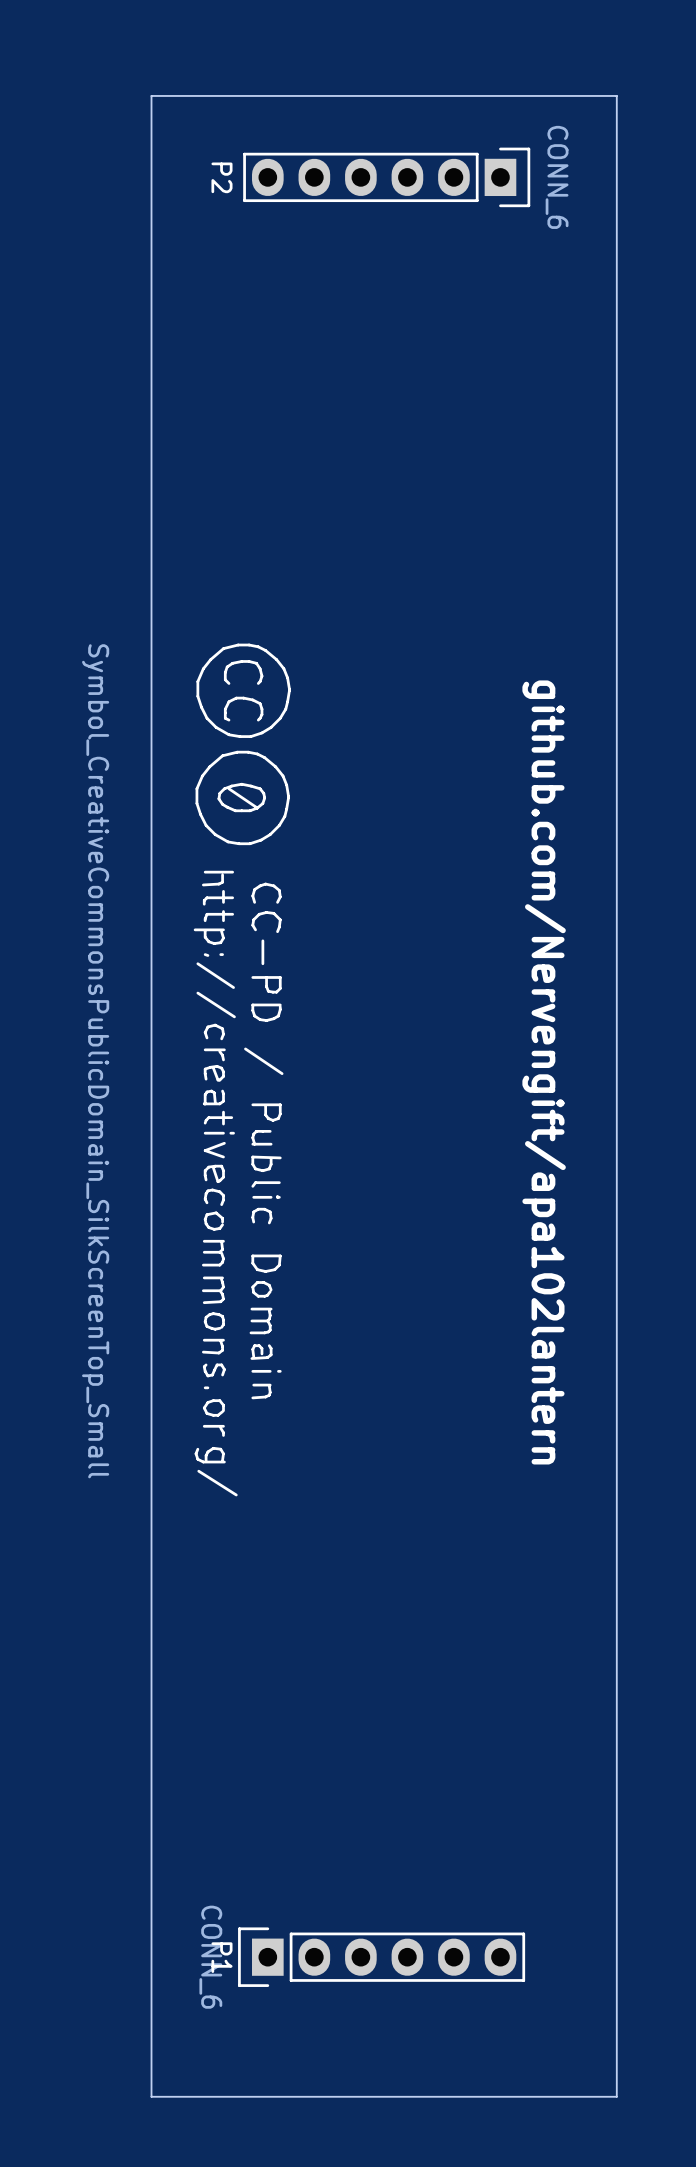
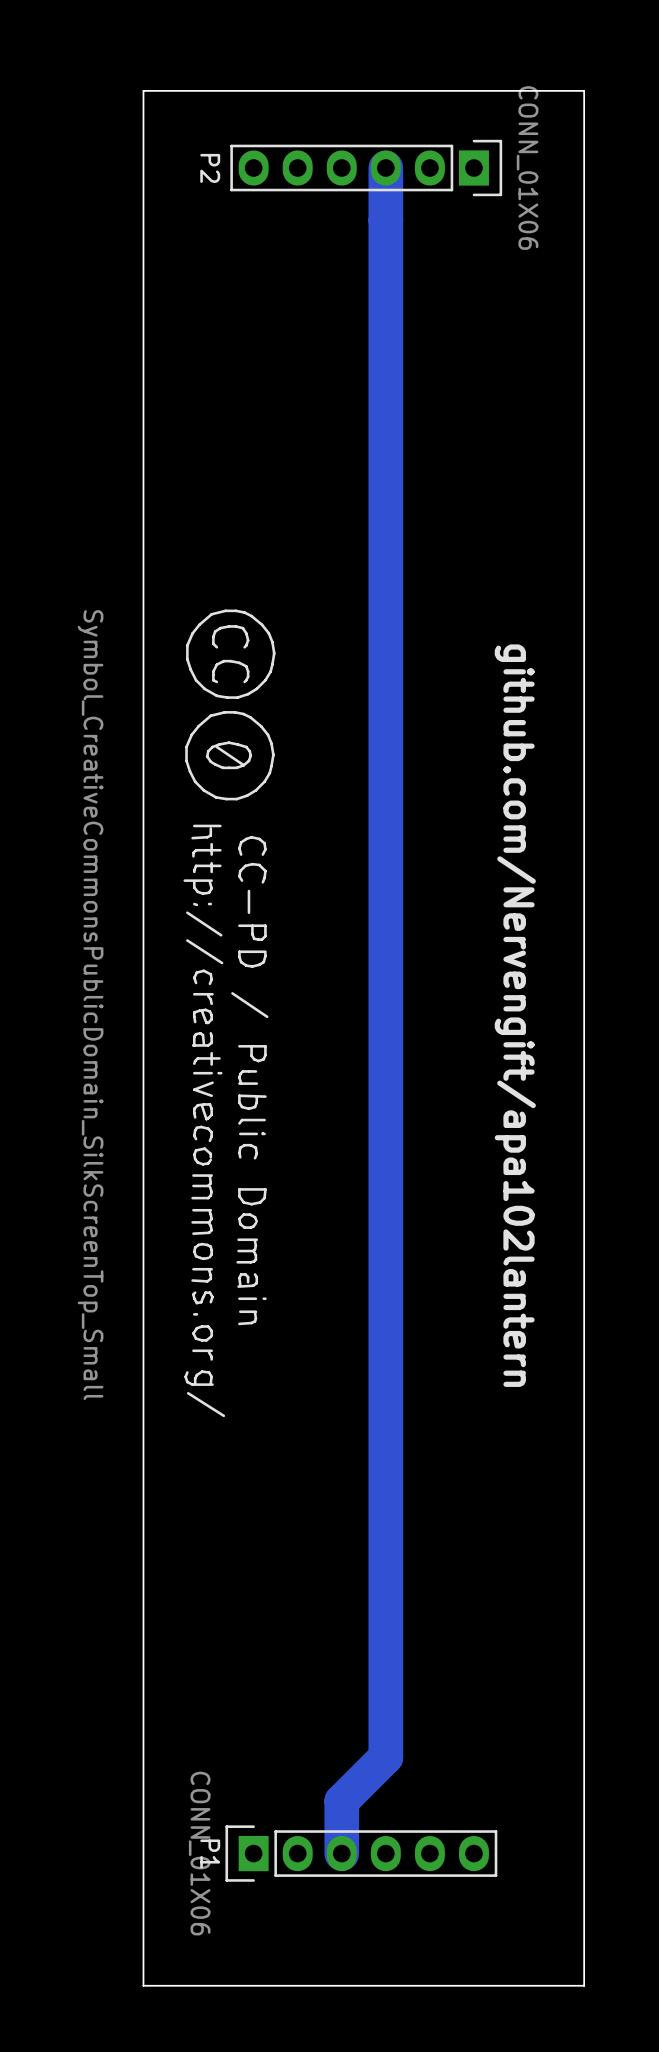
track: none -> (385, 168) (385, 1757) (341, 1801) (341, 1853)
P2 value: CONN_6 (557, 177) -> CONN_01X06 (527, 168)
P1 value: CONN_6 (210, 1957) -> CONN_01X06 (199, 1853)

